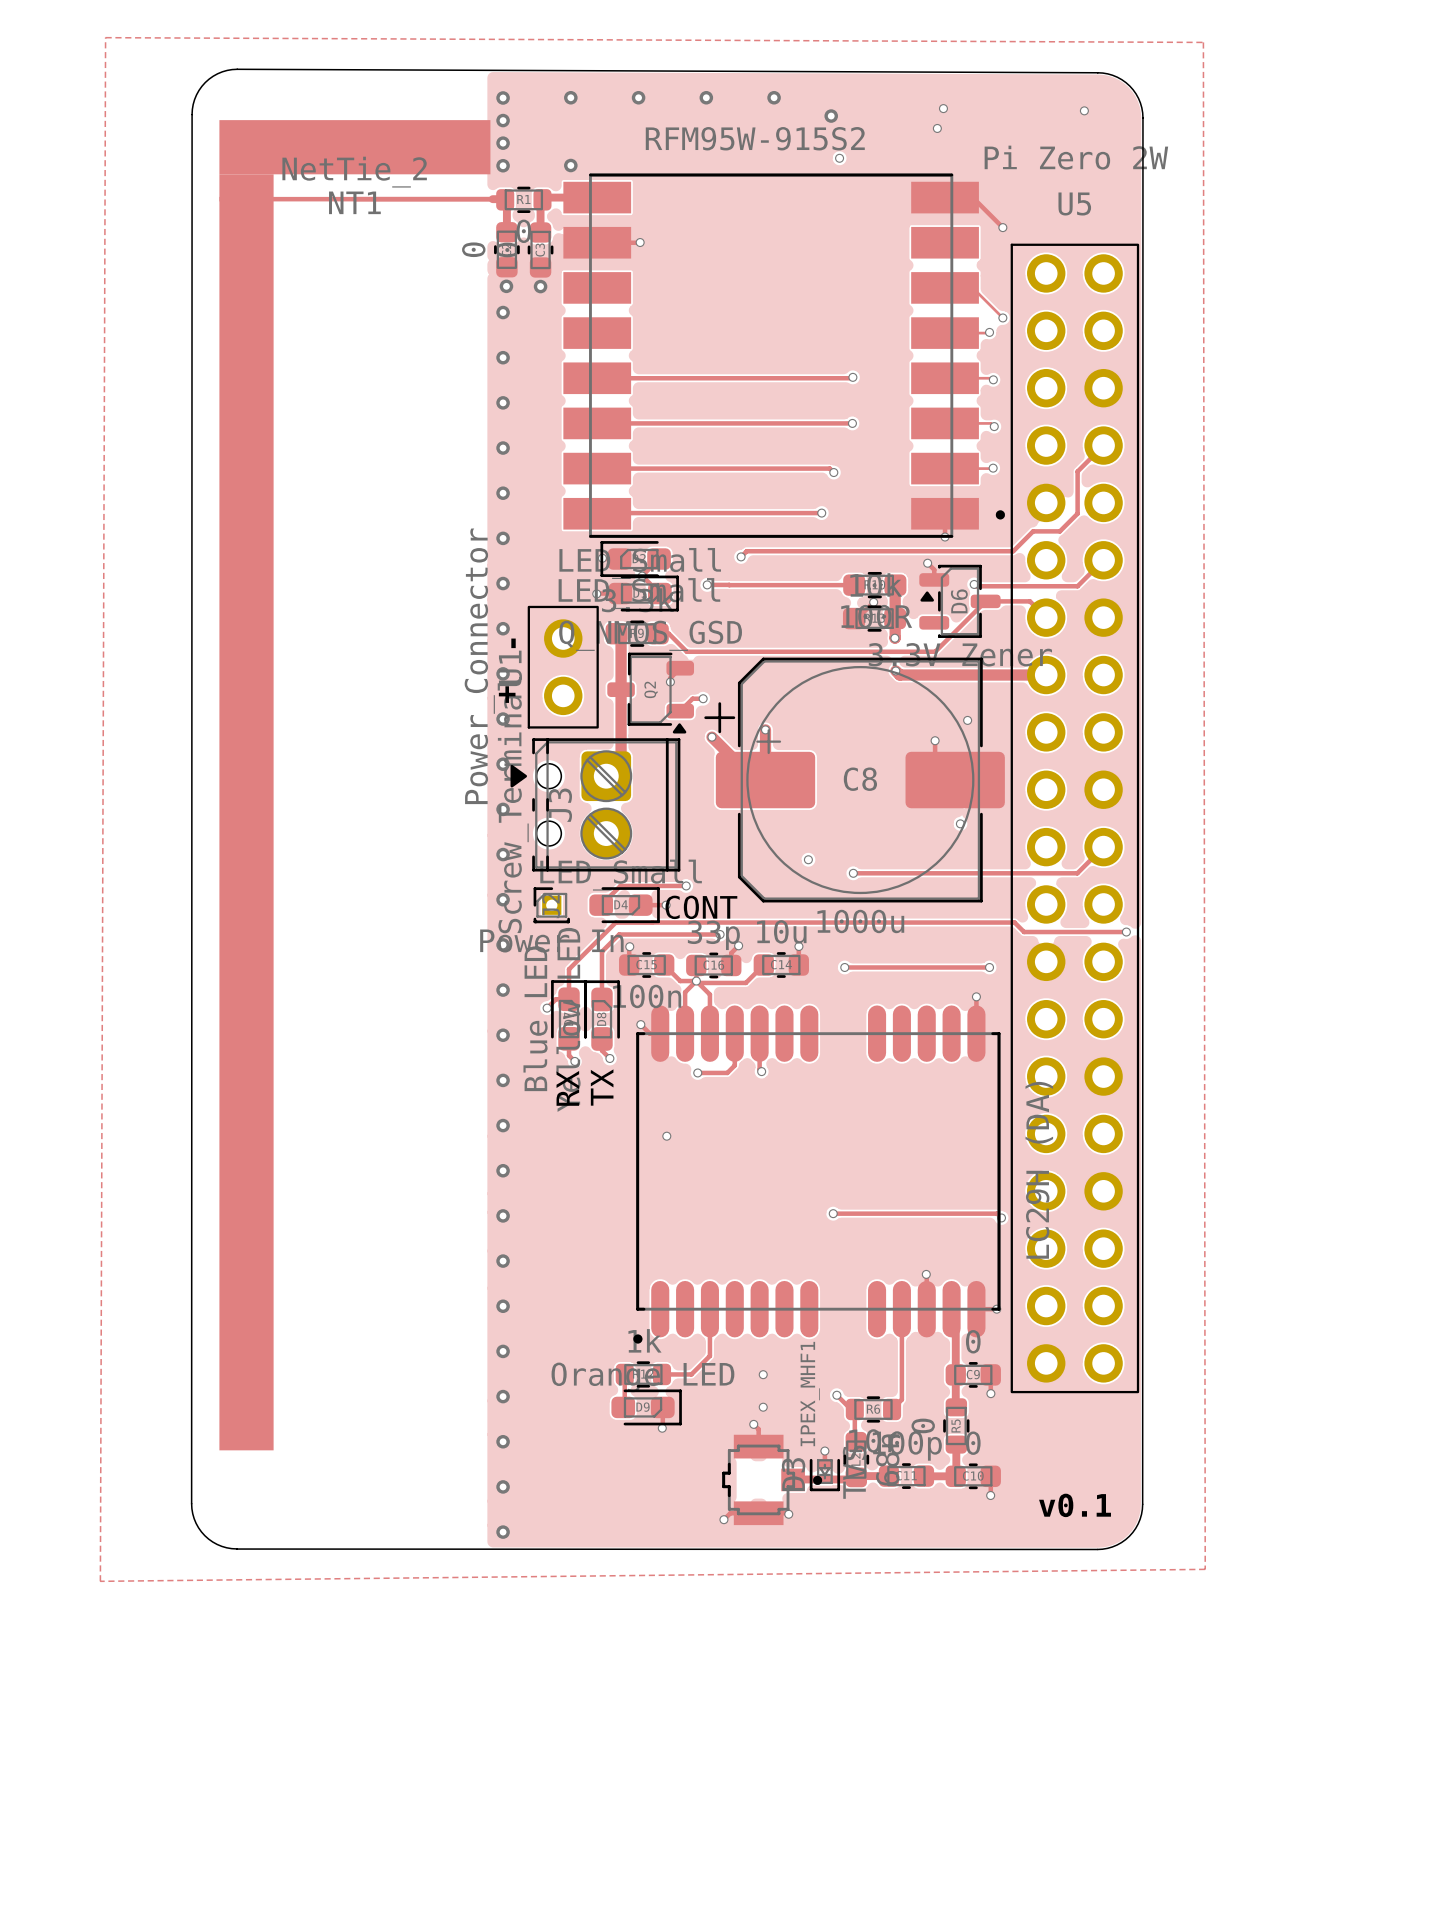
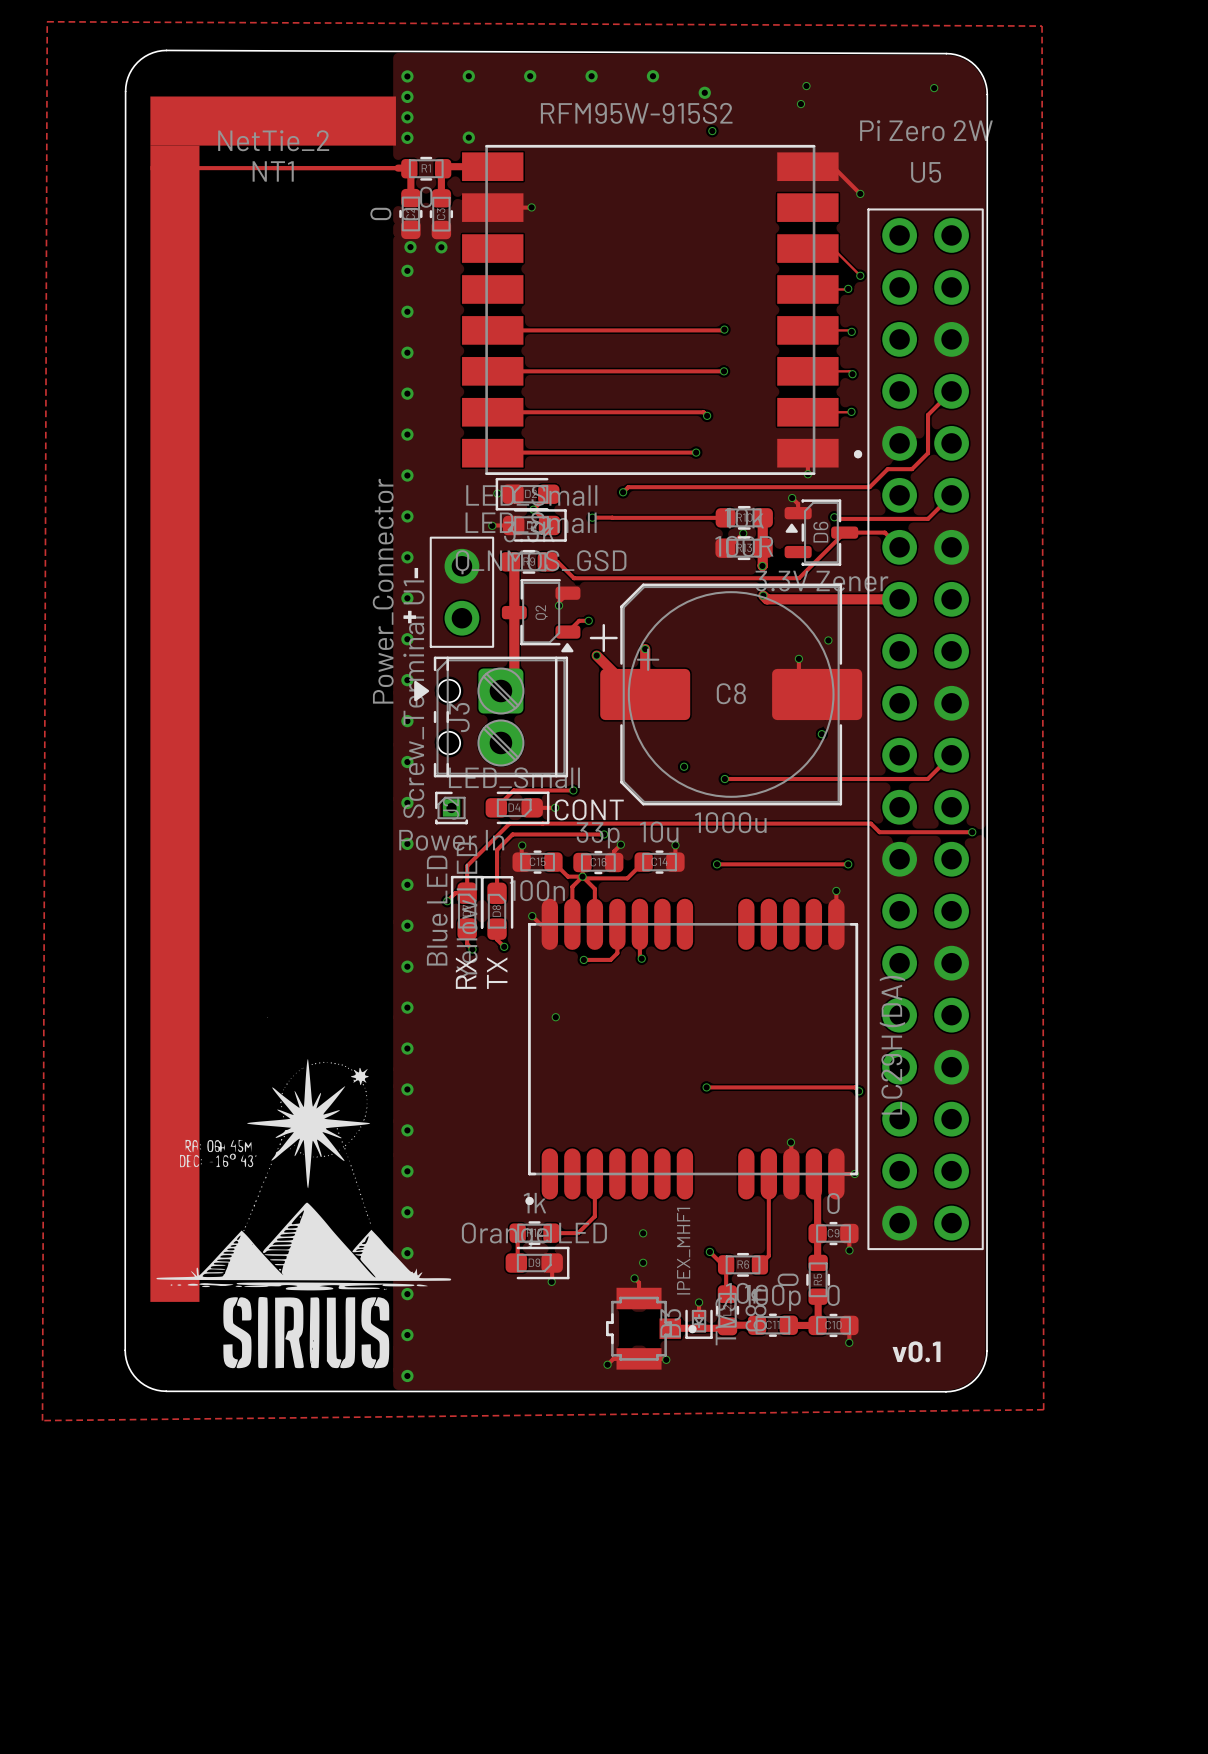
drawing: none -> [156, 1017, 452, 1369]

